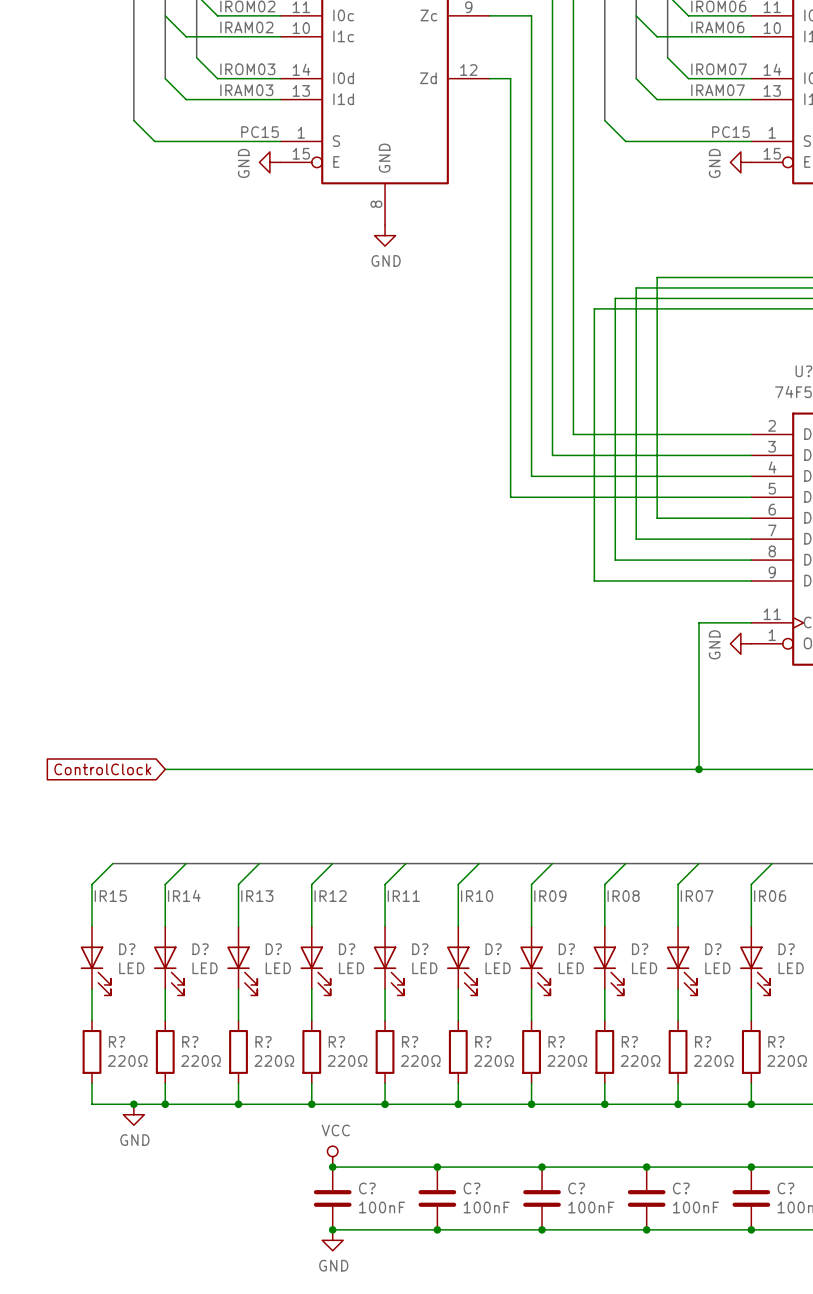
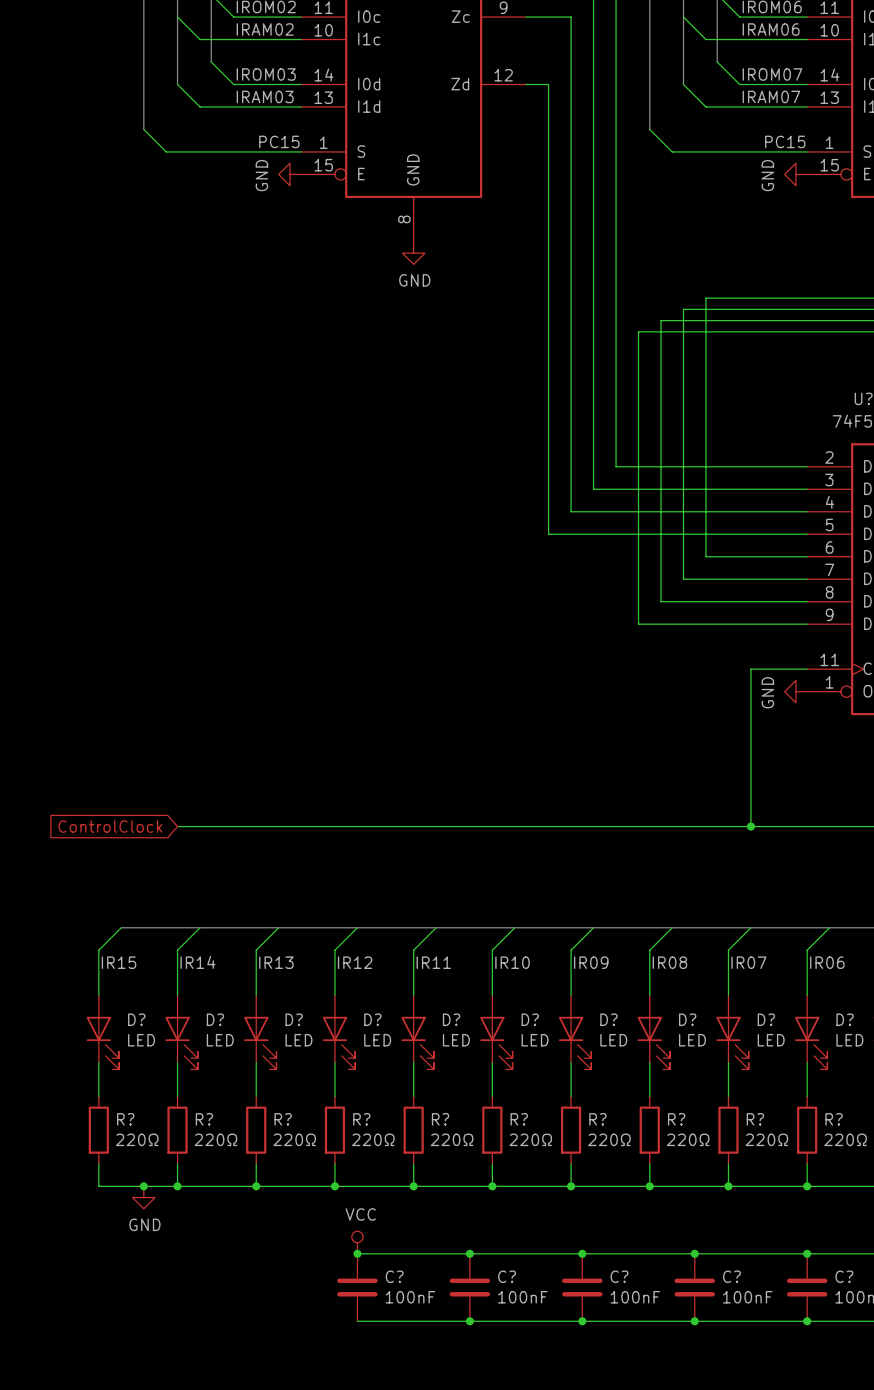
junction: (332, 1229) -> none
power symbol: GND (332, 1240) -> none

